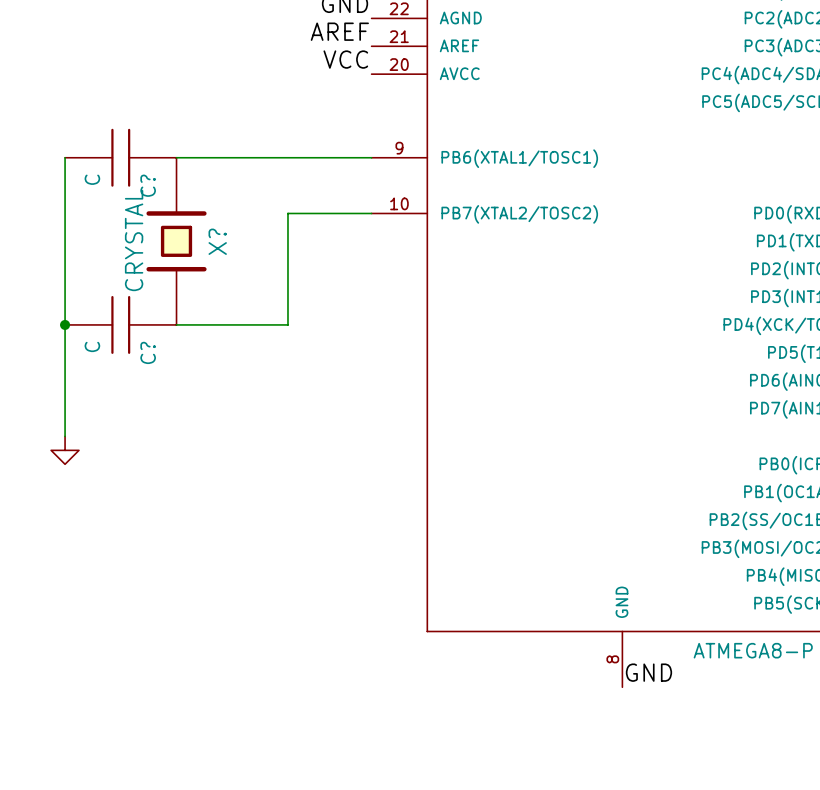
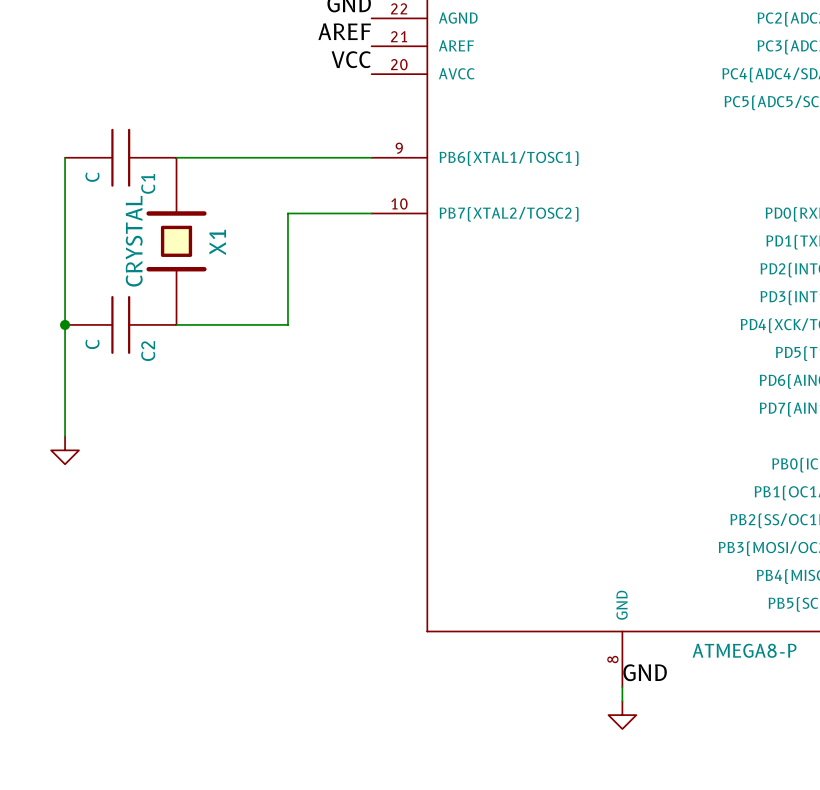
C? name: C? (148, 185) -> C1 (148, 183)
X? name: X? (217, 241) -> X1 (217, 242)
C? name: C? (148, 352) -> C2 (148, 351)
wire: none -> (622, 687) (622, 701)
power symbol: none -> (622, 715)

